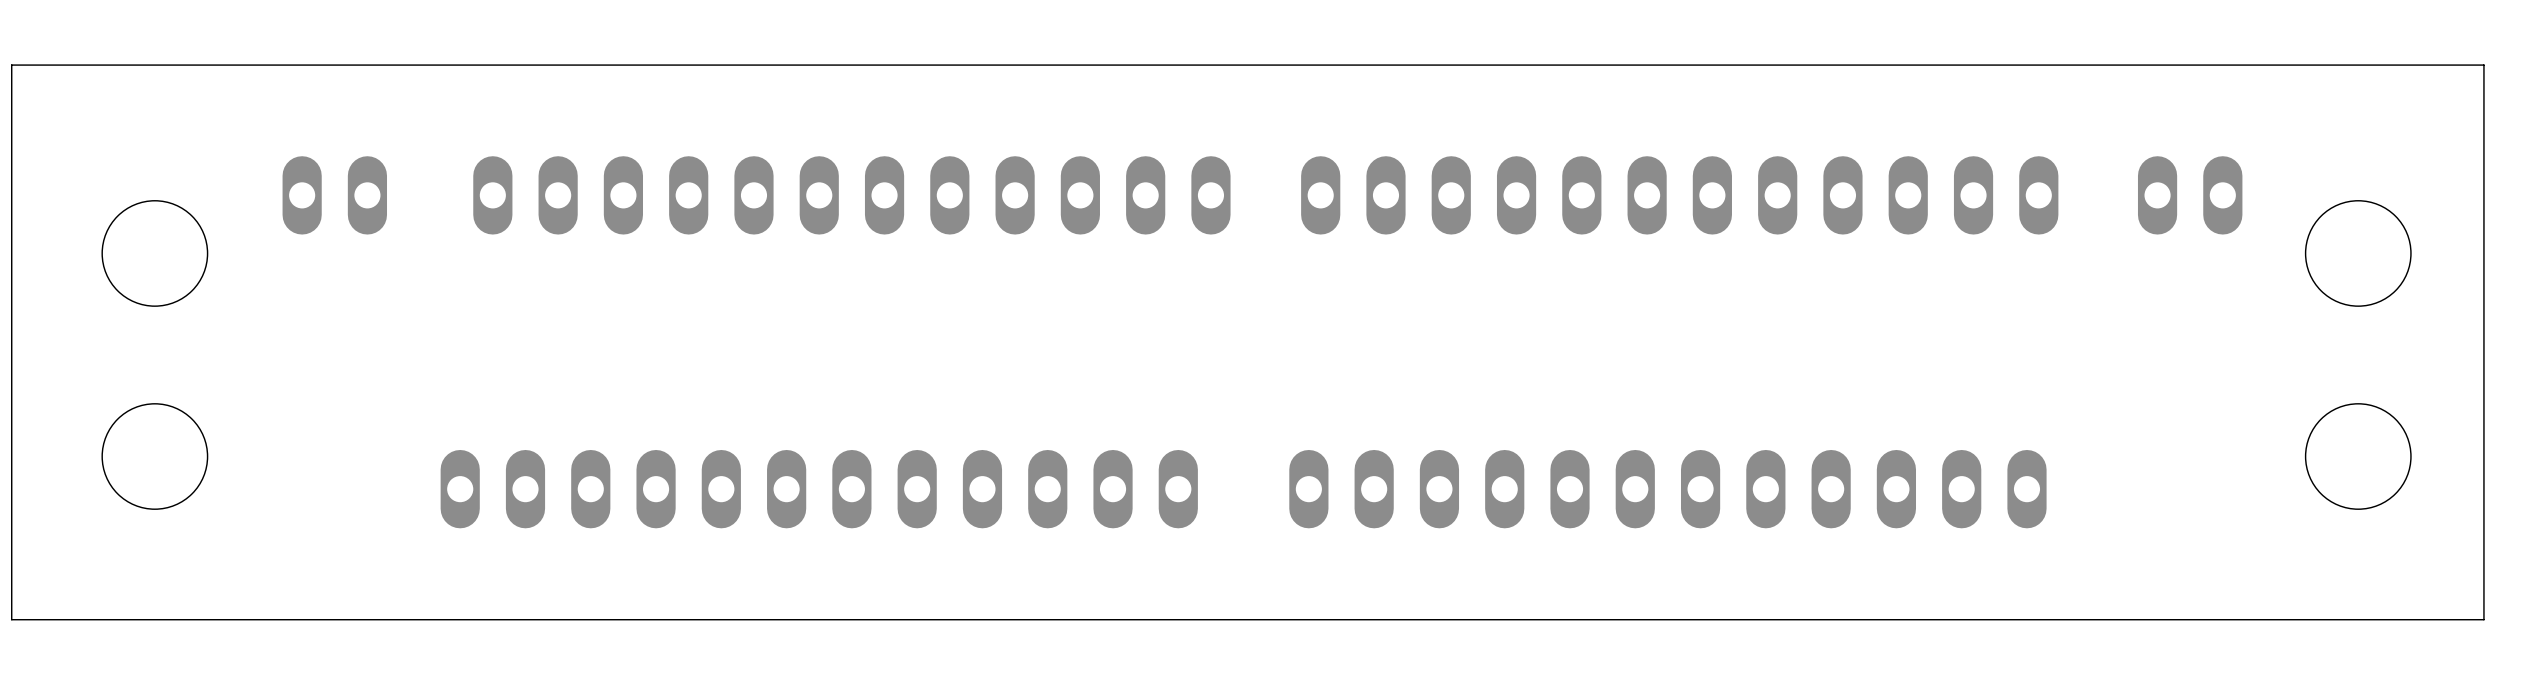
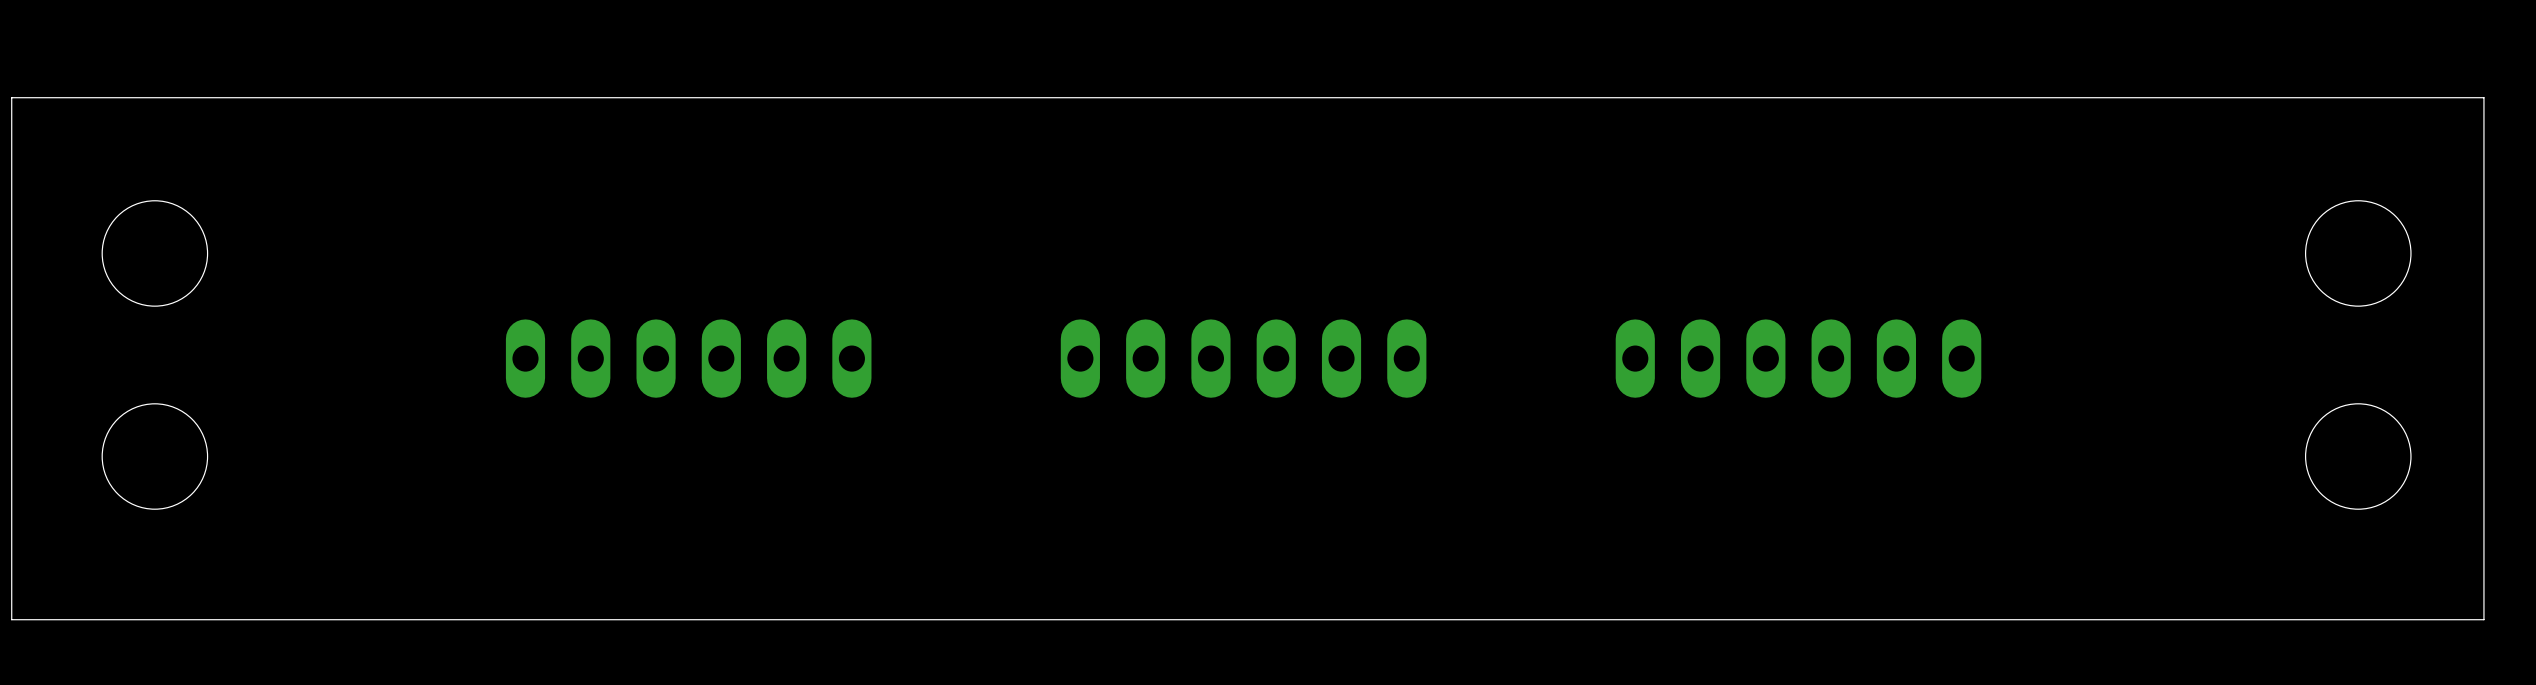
board edge: (2483, 97) (2483, 65) (11, 65) (11, 97) -> (2483, 97) (11, 97)
part: (334, 195) -> none
part: (851, 195) -> none
part: (1679, 195) -> none
part: (2190, 195) -> none
part: none -> (688, 358)
part: none -> (1243, 358)
part: none -> (1798, 358)
part: (819, 489) -> none
part: (1667, 489) -> none

